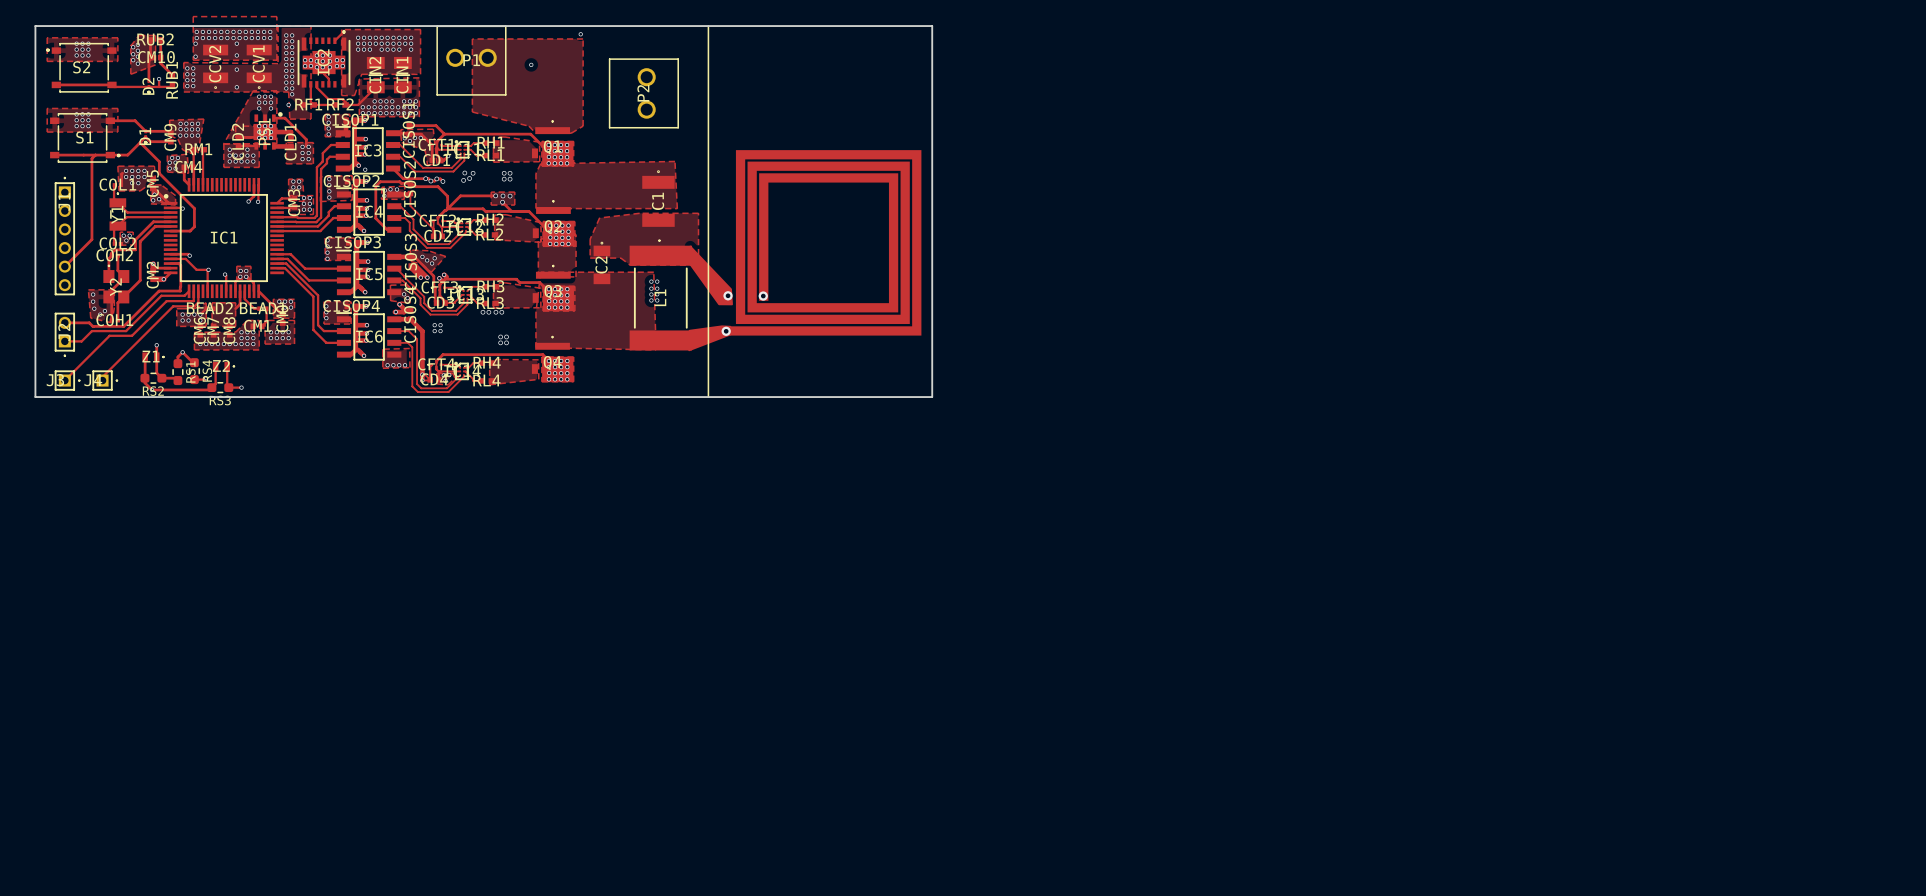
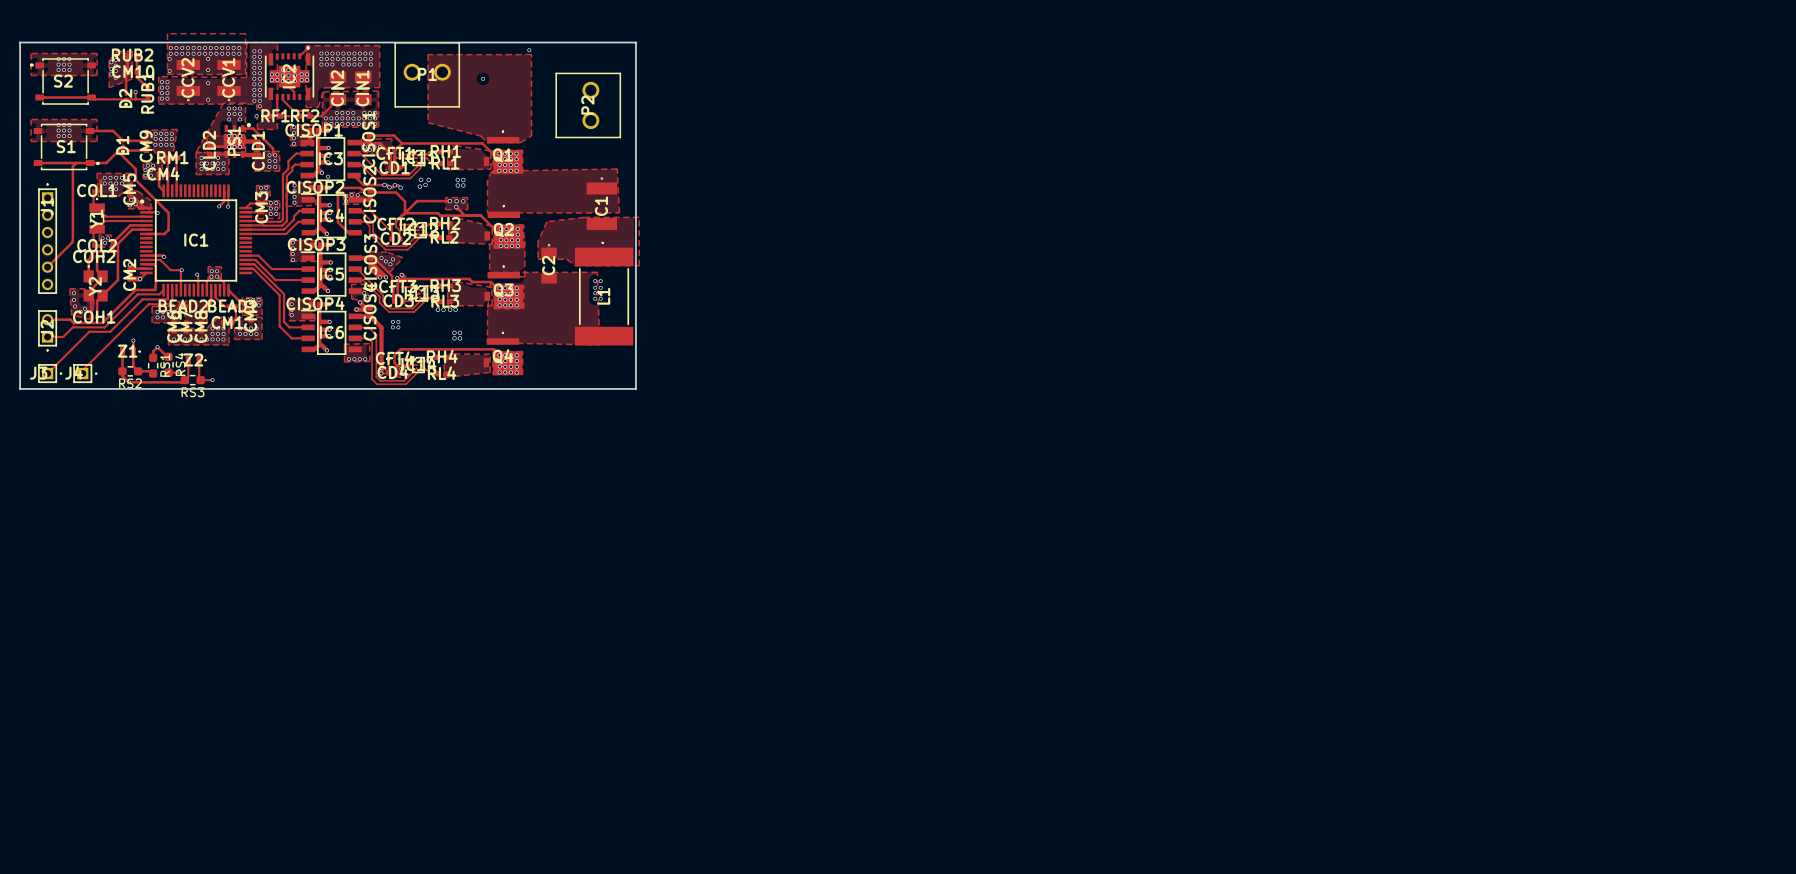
board edge: (694, 26) (932, 26) (932, 397) (694, 397) -> (635, 42) (635, 388)
line: (708, 26) (708, 397) -> none
drawing: [688, 150, 922, 352] -> none
via: (728, 295) -> none
via: (763, 296) -> none
via: (726, 331) -> none

